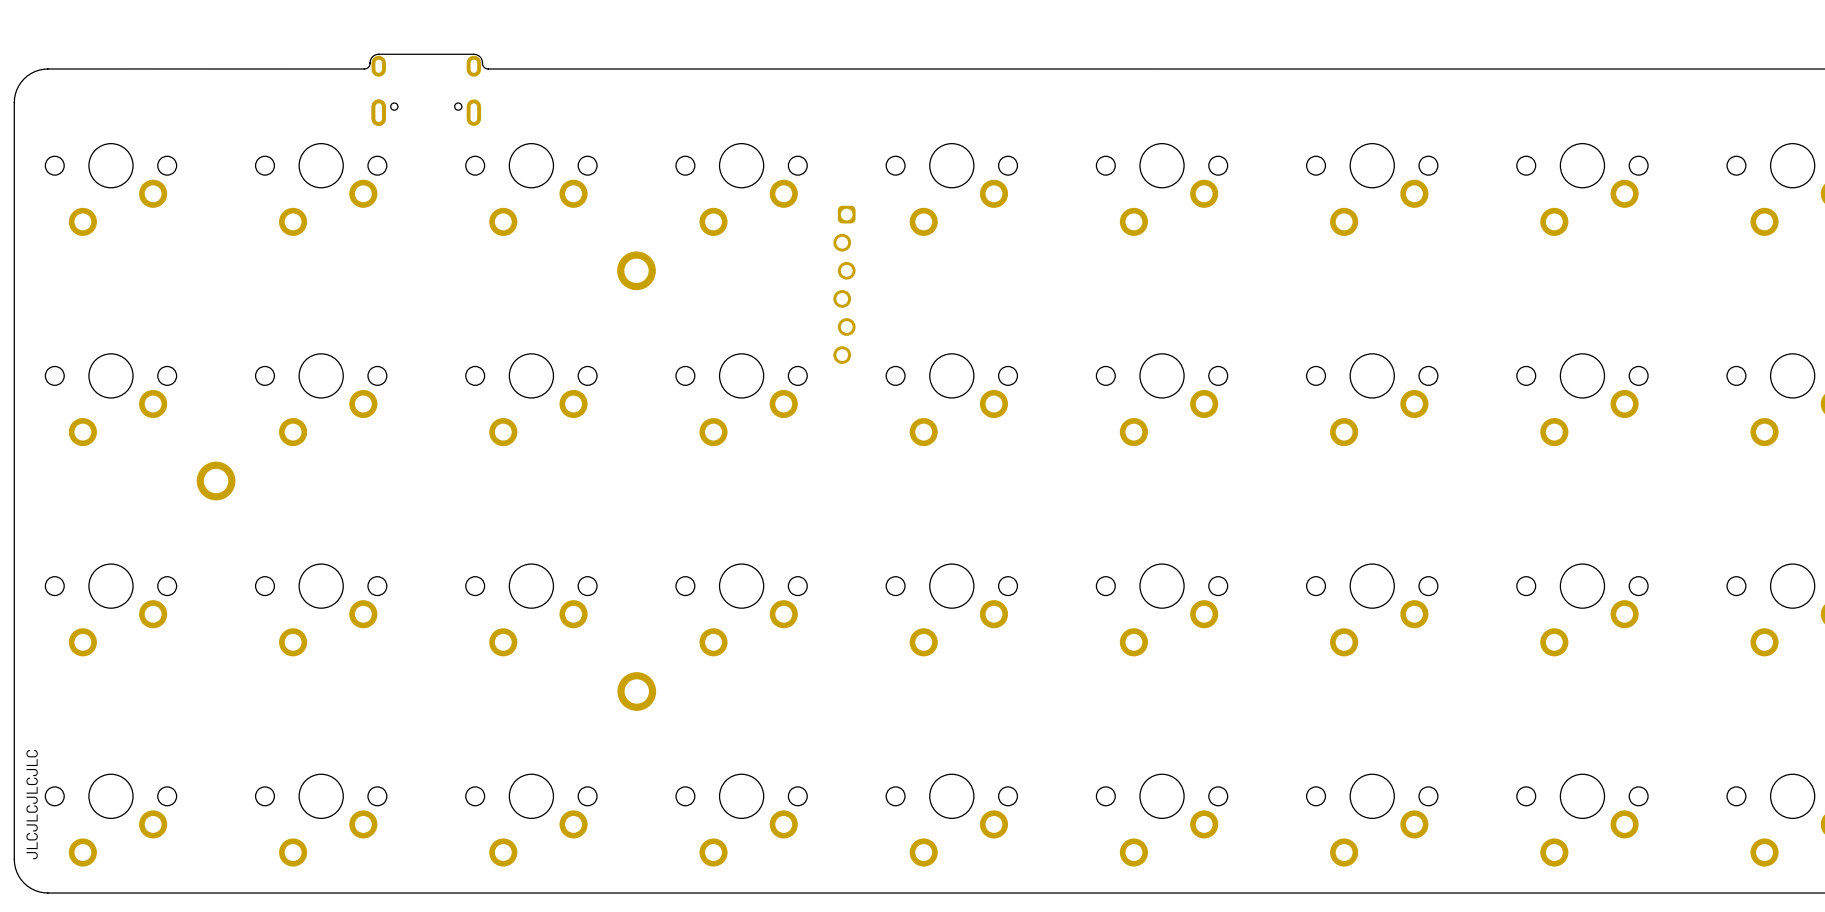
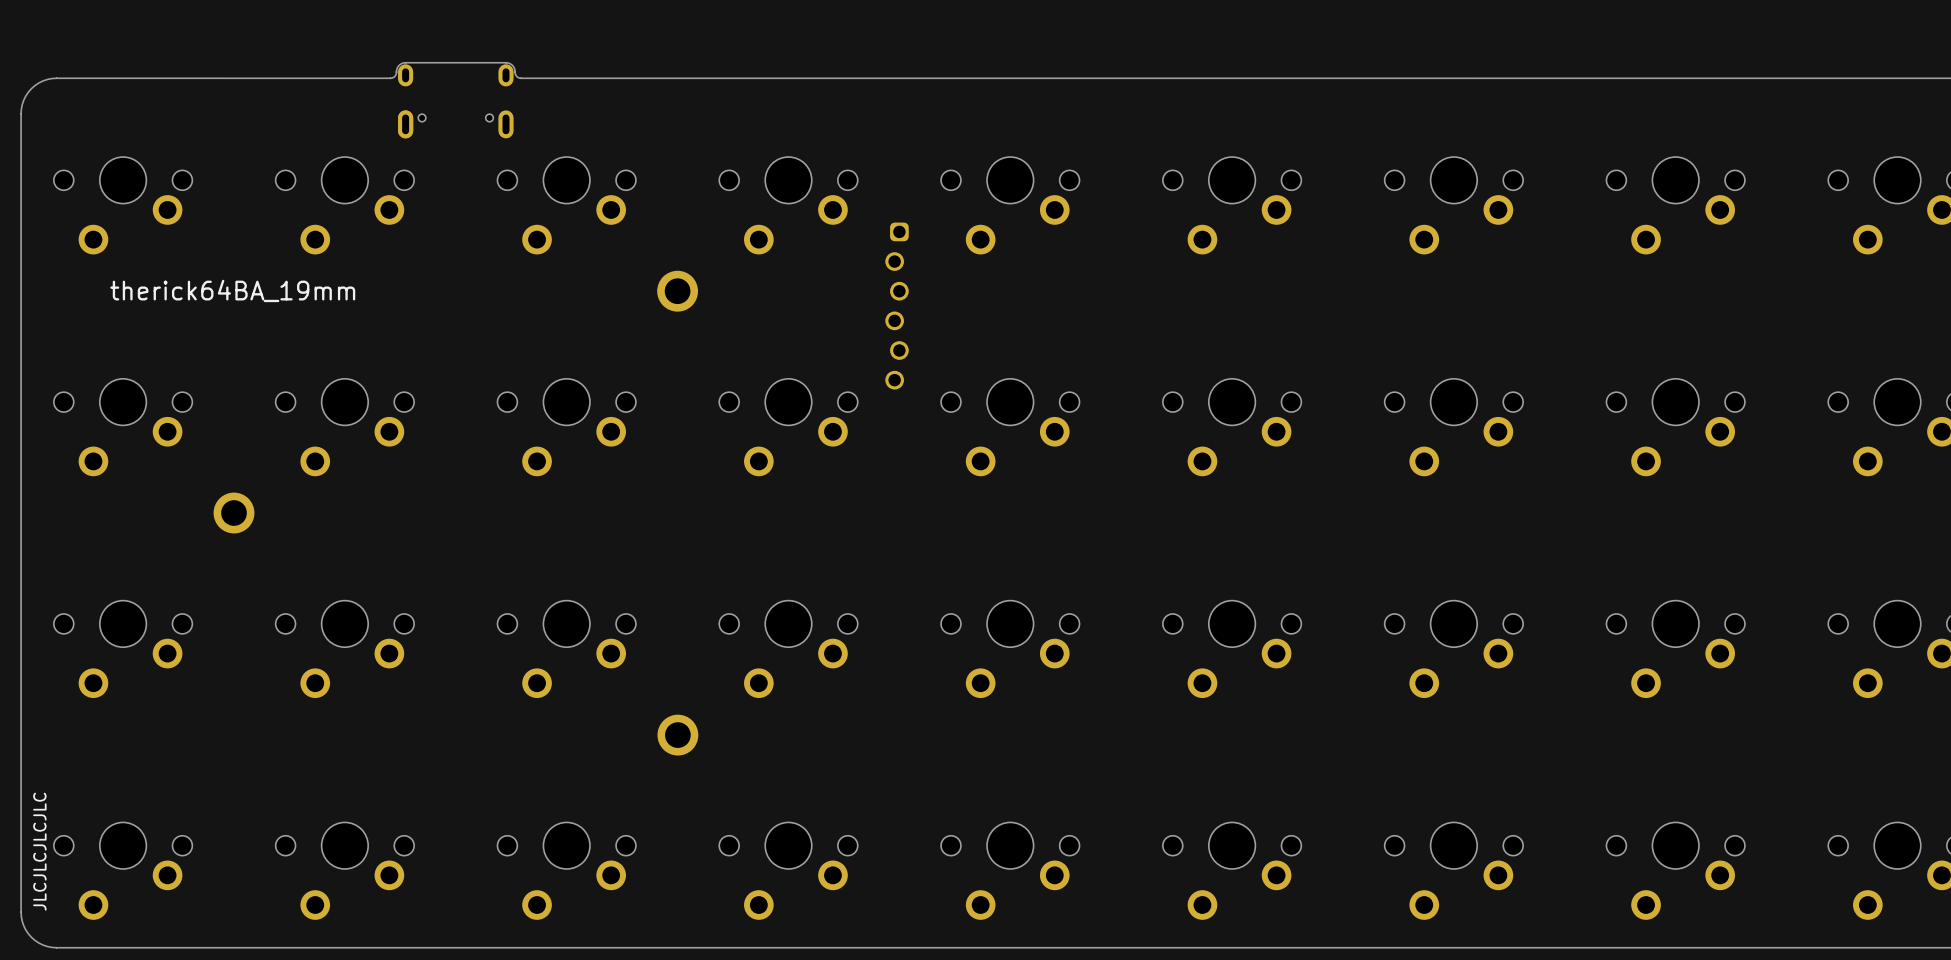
text: none -> therick64BA_19mm (232, 290)

